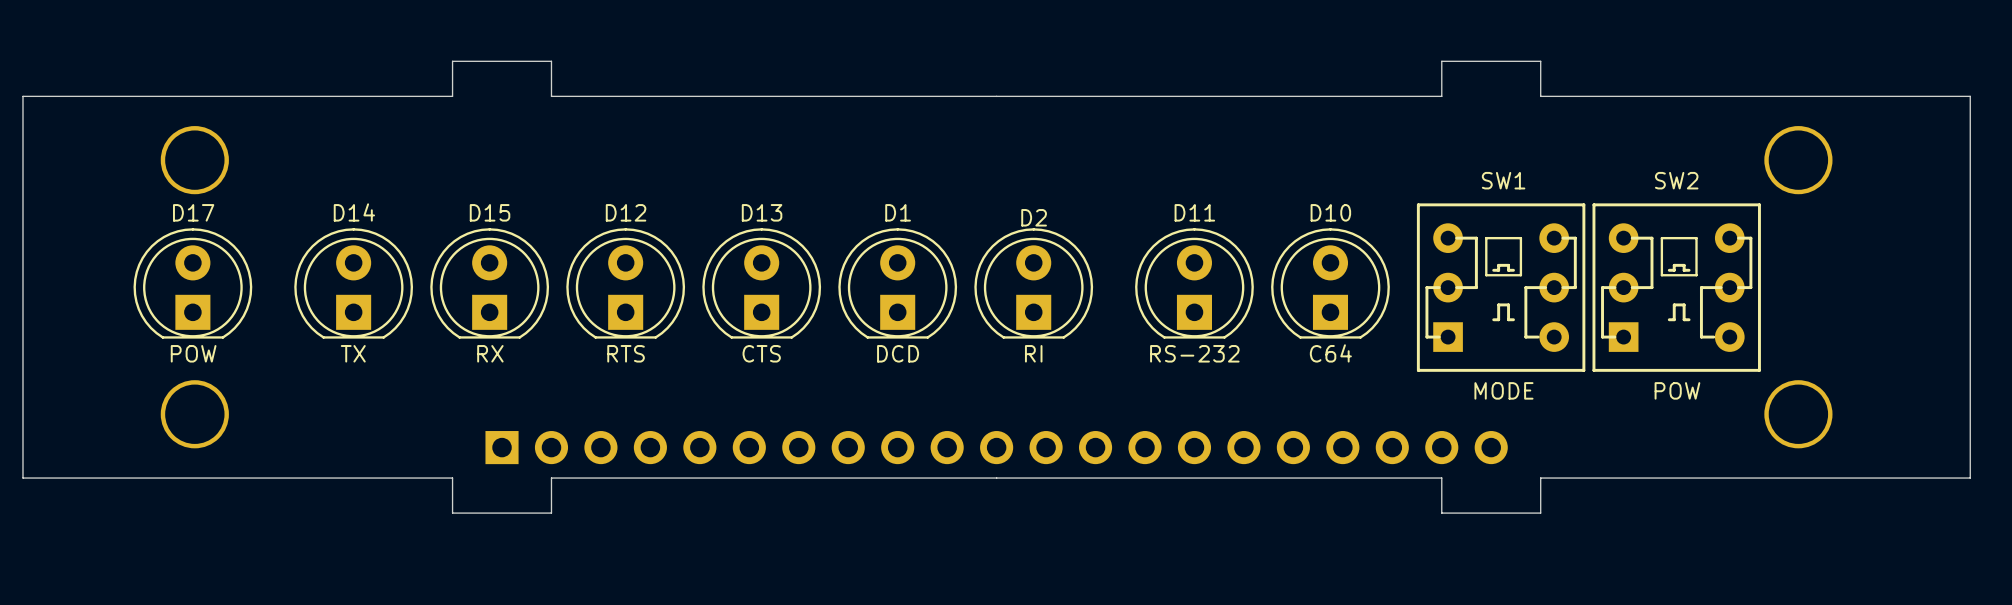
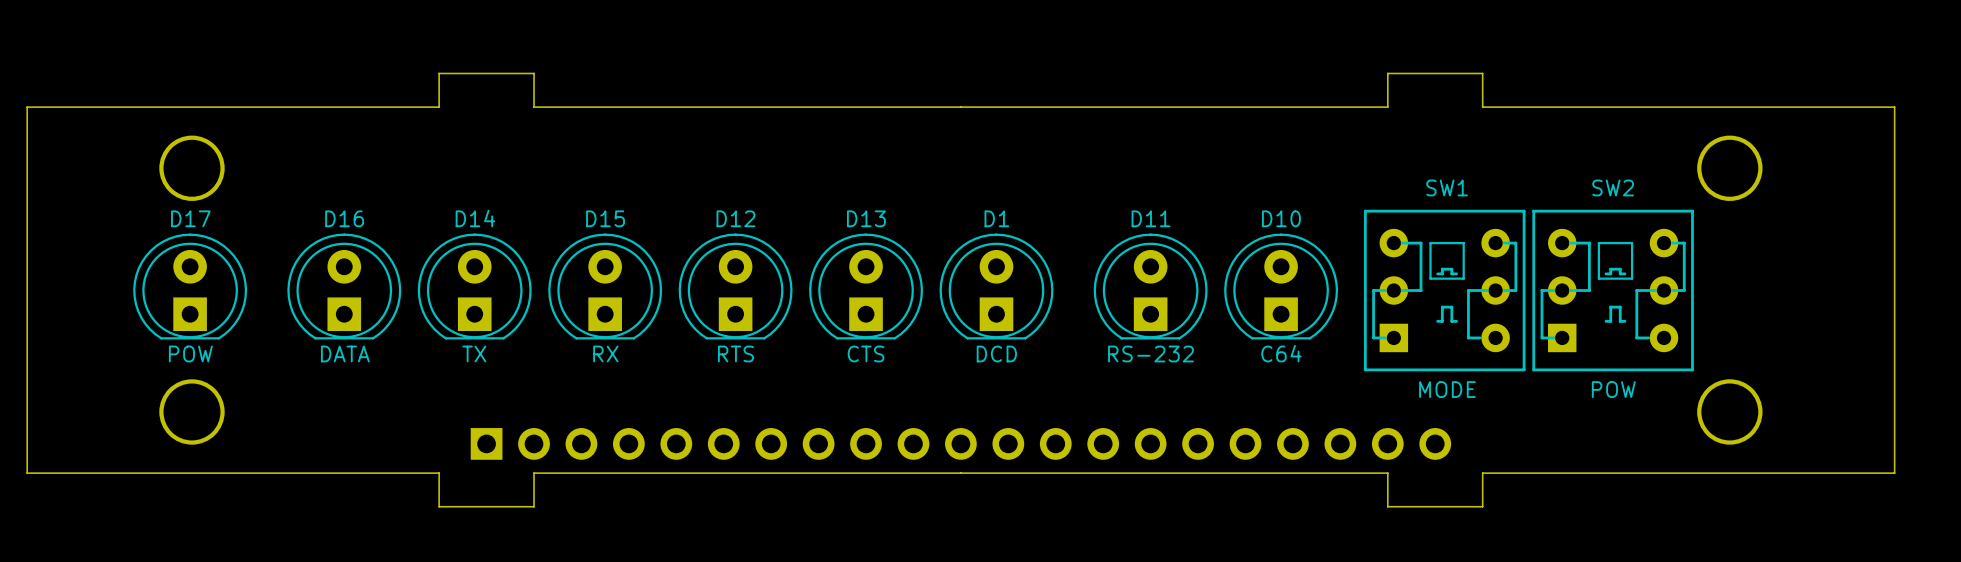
D14 name: D14 (354, 212) -> D16 (344, 218)
D15 name: D15 (490, 212) -> D14 (475, 218)
D12 name: D12 (626, 212) -> D15 (605, 218)
D13 name: D13 (762, 212) -> D12 (735, 218)
D1 name: D1 (898, 212) -> D13 (866, 218)
D2 name: D2 (1034, 217) -> D1 (996, 218)
D14 value: TX (353, 353) -> DATA (345, 353)
D15 value: RX (490, 353) -> TX (474, 353)
D12 value: RTS (626, 353) -> RX (605, 353)
D13 value: CTS (761, 353) -> RTS (735, 353)
D1 value: DCD (898, 353) -> CTS (866, 353)
D2 value: RI (1033, 353) -> DCD (996, 353)

